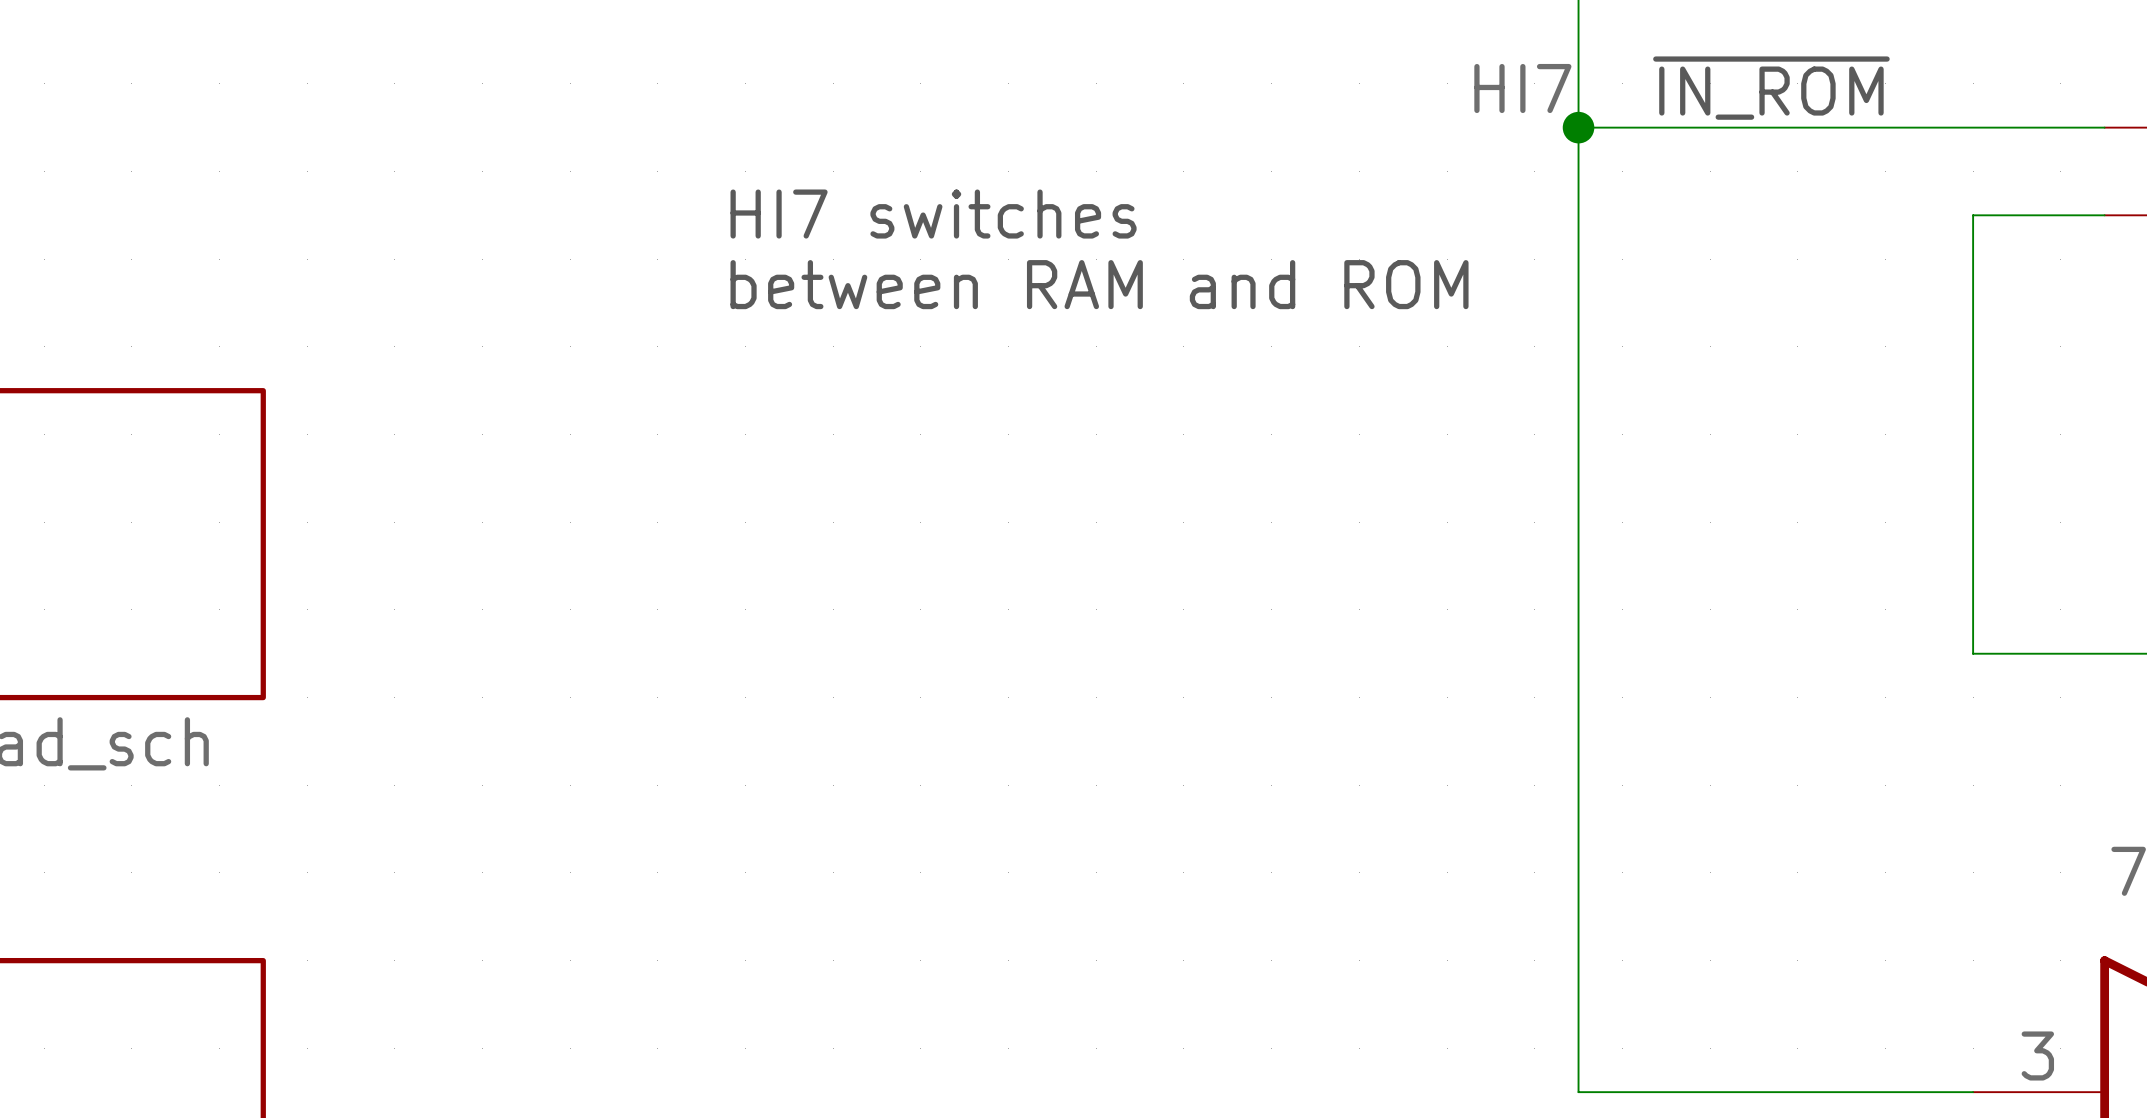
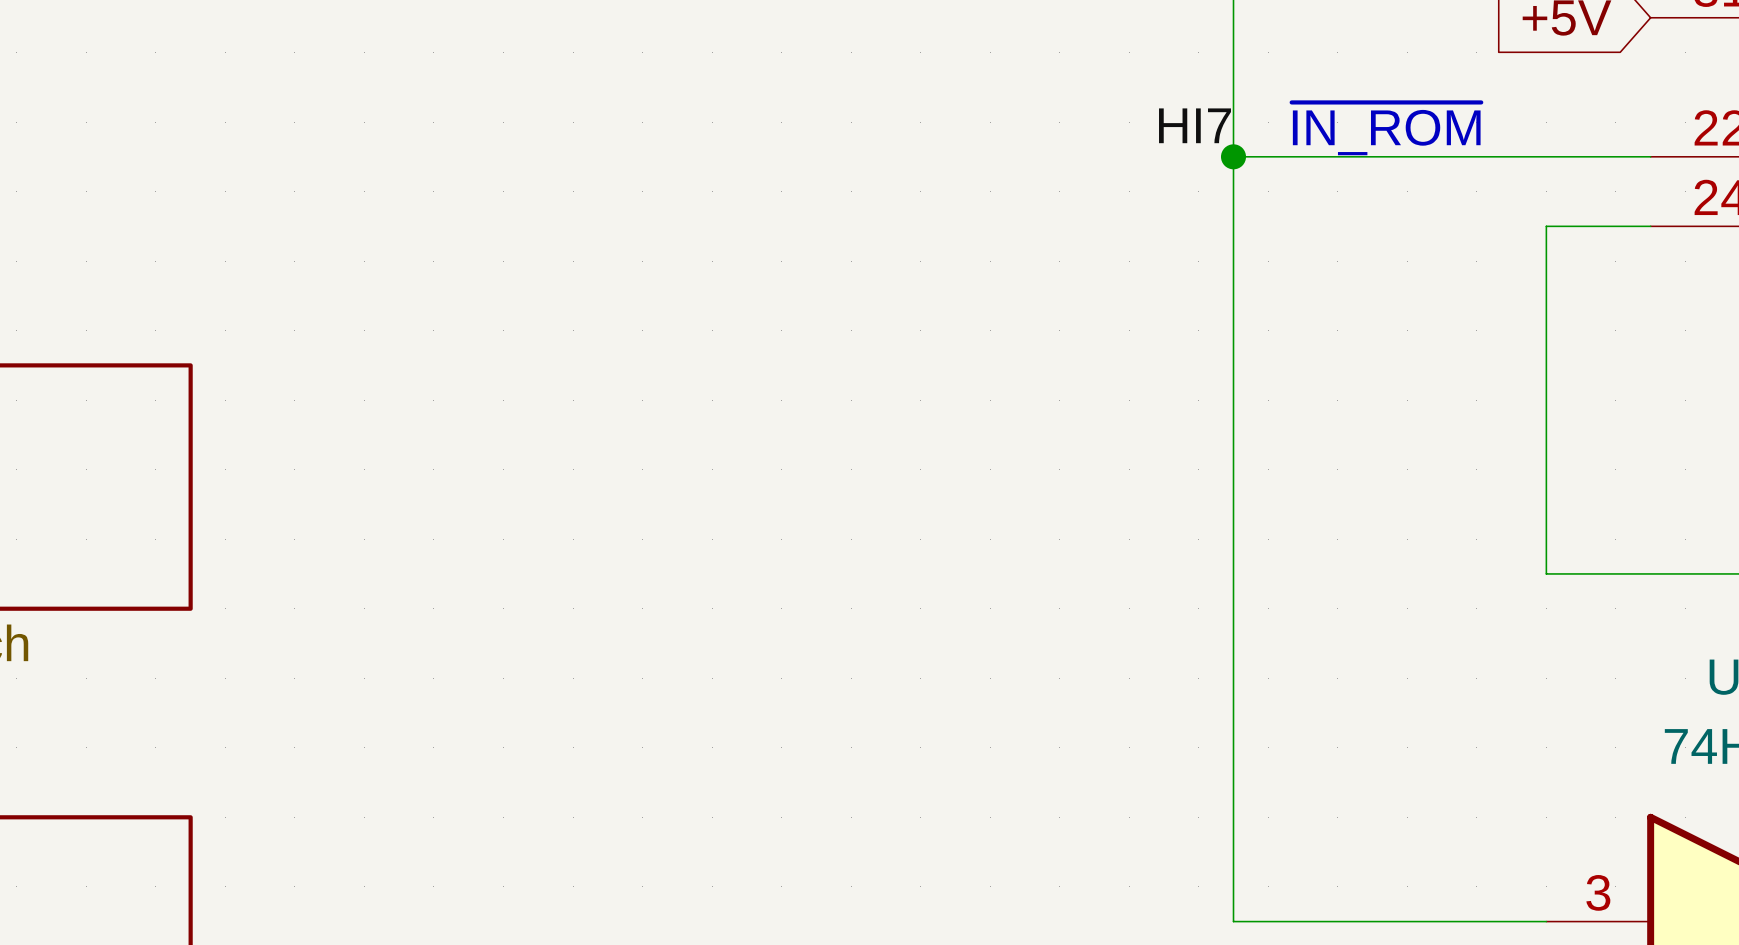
text: HI7 switches (933, 214) -> none
text: between RAM and ROM (1099, 284) -> none

